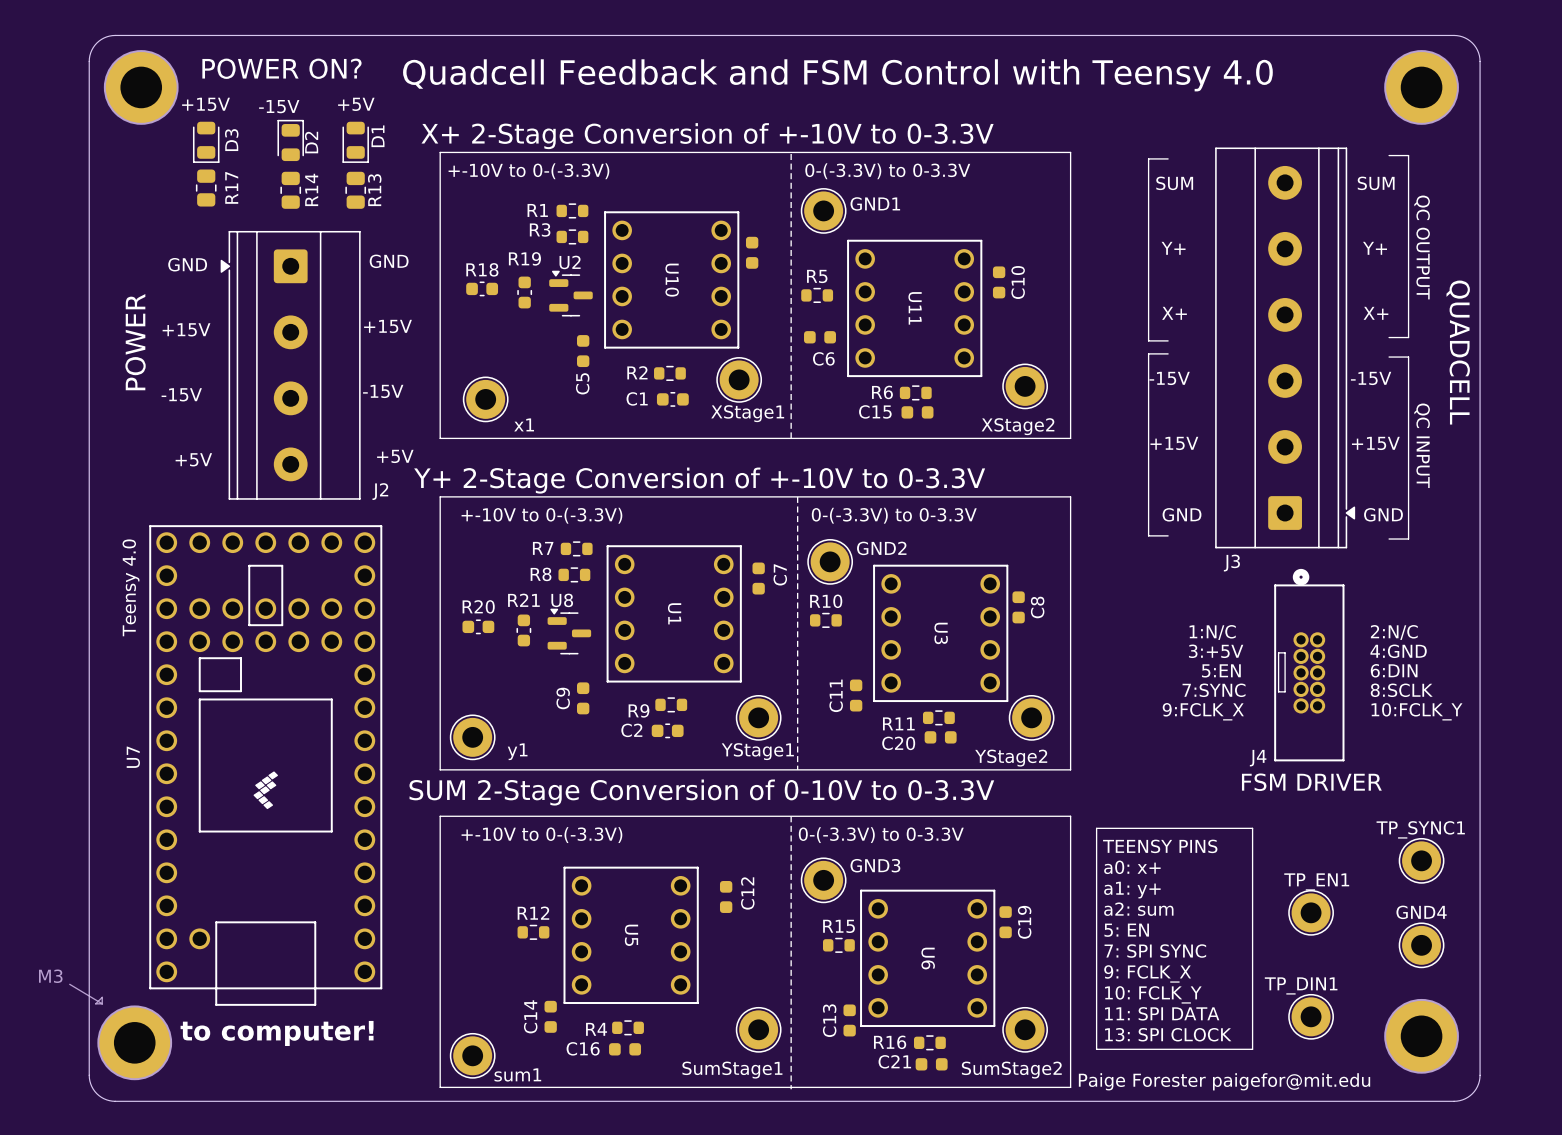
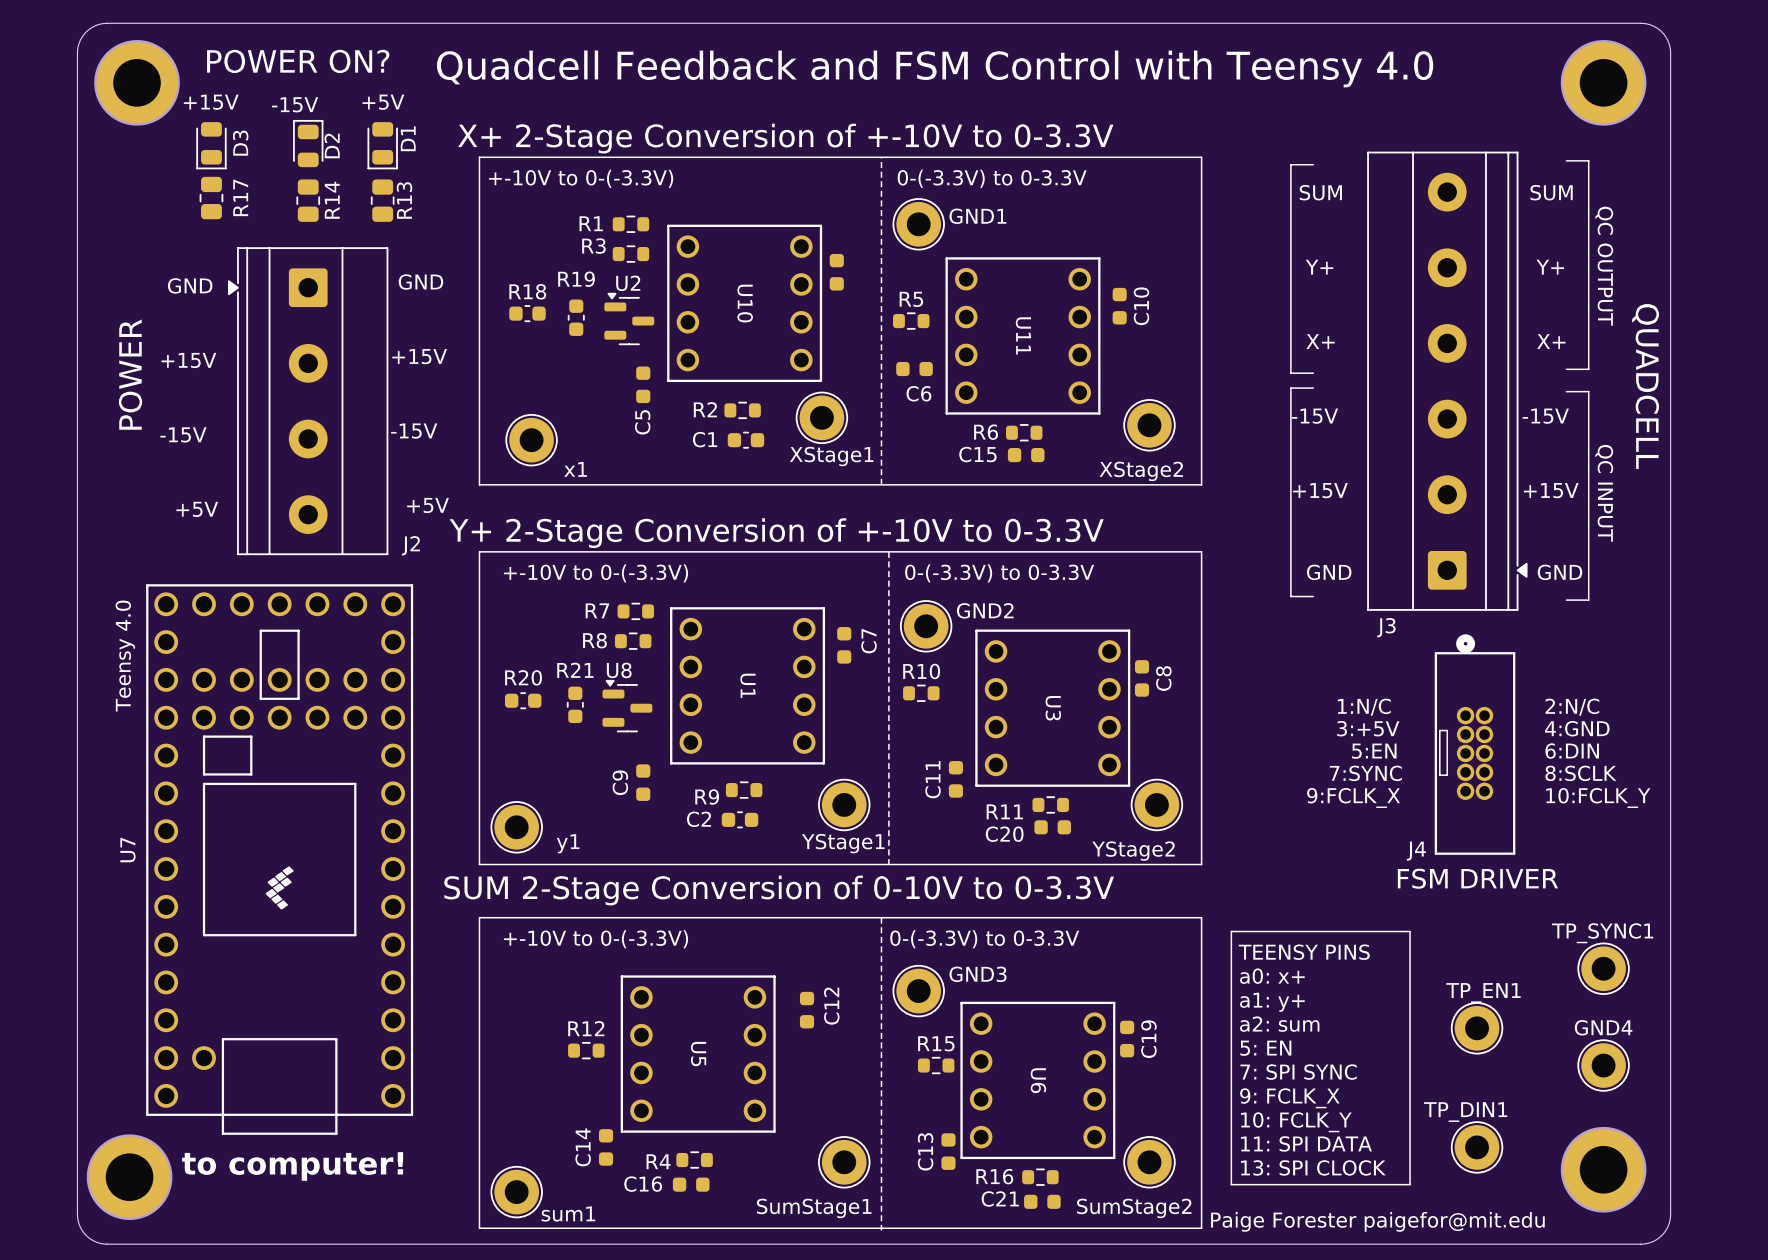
text: M3 (50, 976) -> none
line: (69, 984) (102, 1003) -> none
line: (102, 1003) (102, 997) (95, 1003) (102, 1003) -> none

